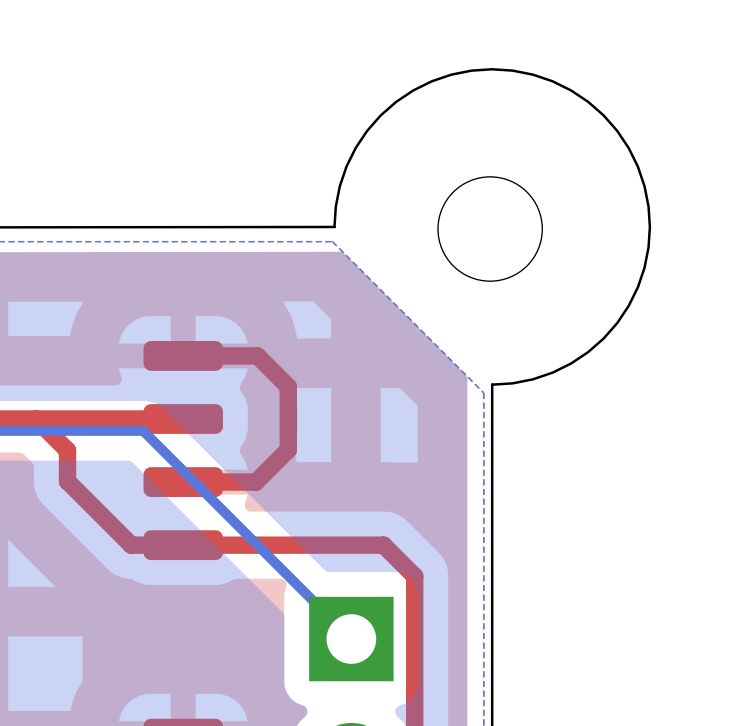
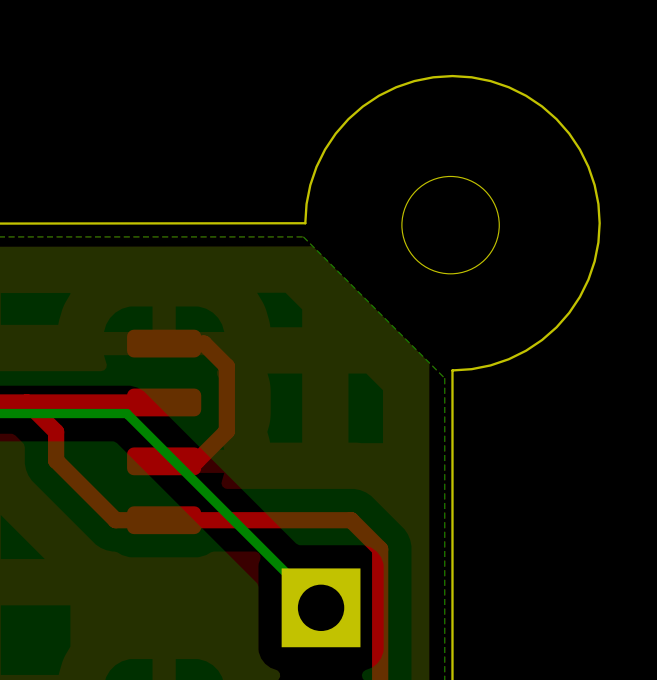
top track: (225, 355) (257, 355) (288, 386) (288, 449) (256, 482) (218, 482) -> (204, 343) (226, 366) (226, 431) (196, 461)

